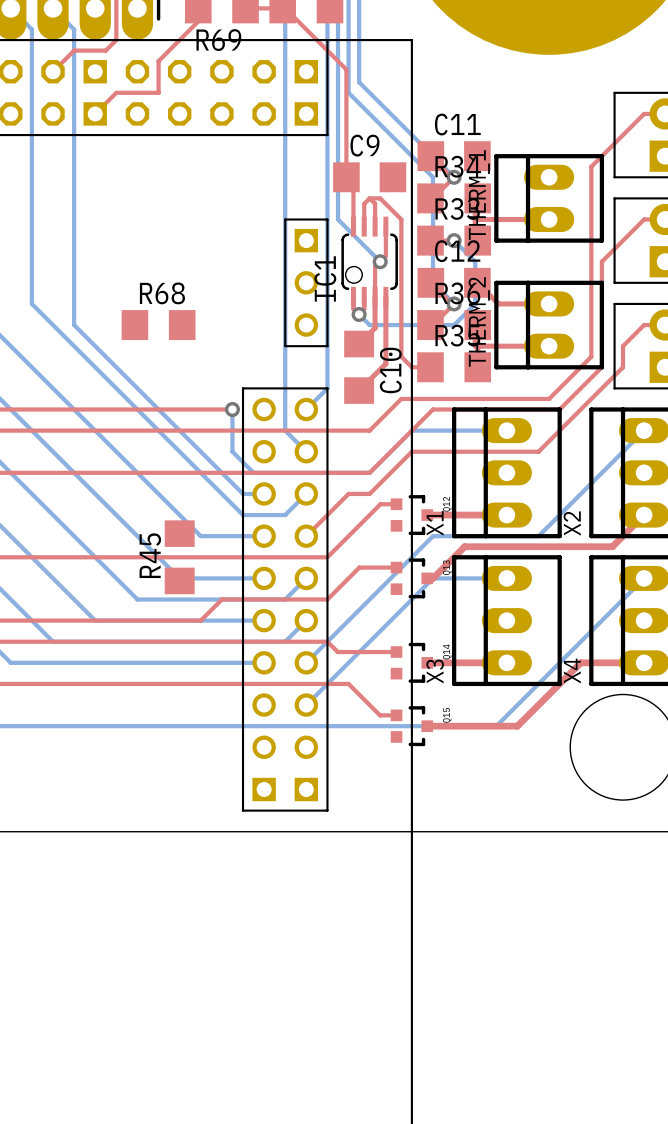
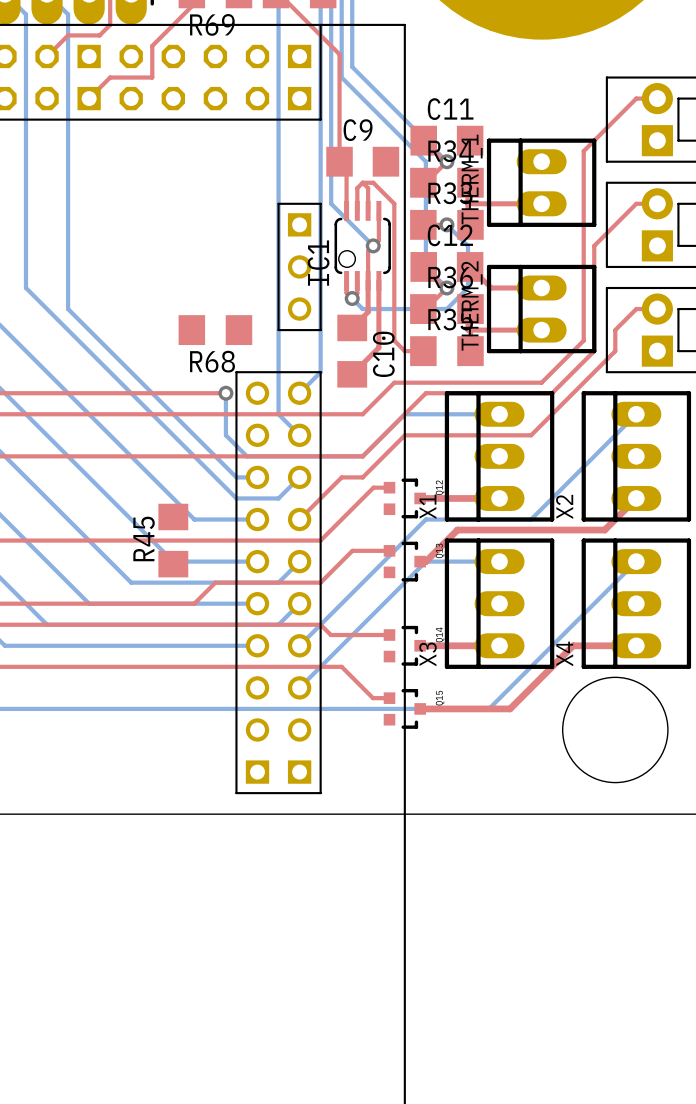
R68 name position: R68 (162, 293) -> R68 (212, 361)
R68 position: (158, 325) -> (215, 330)

